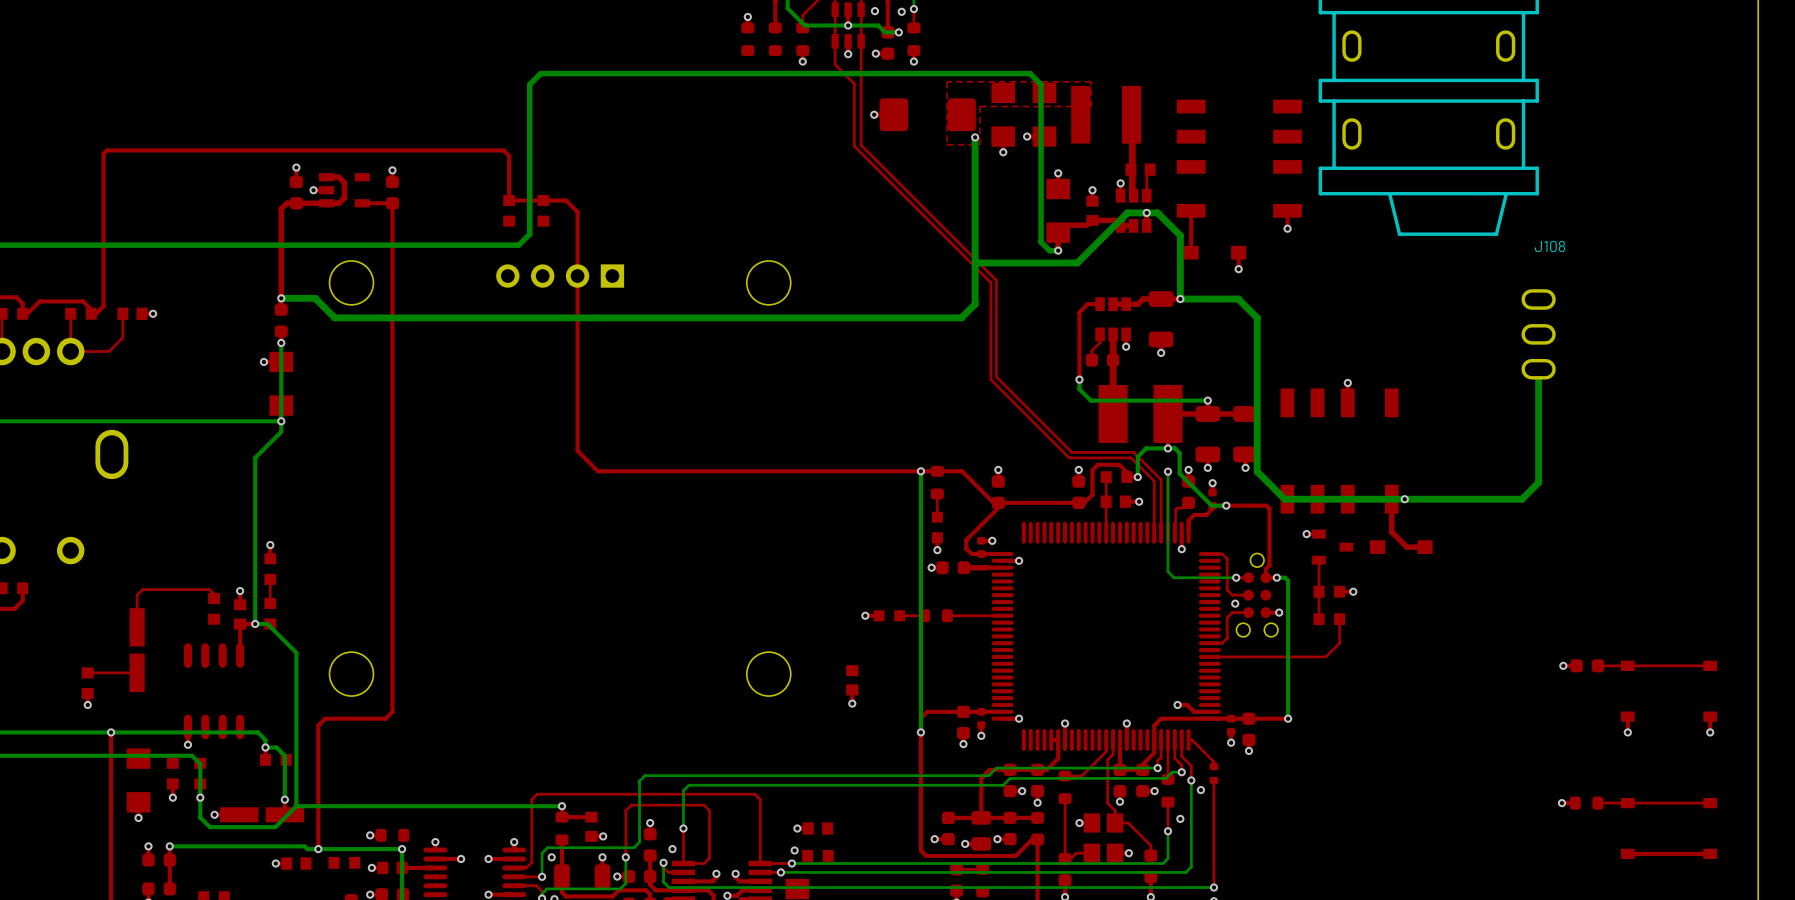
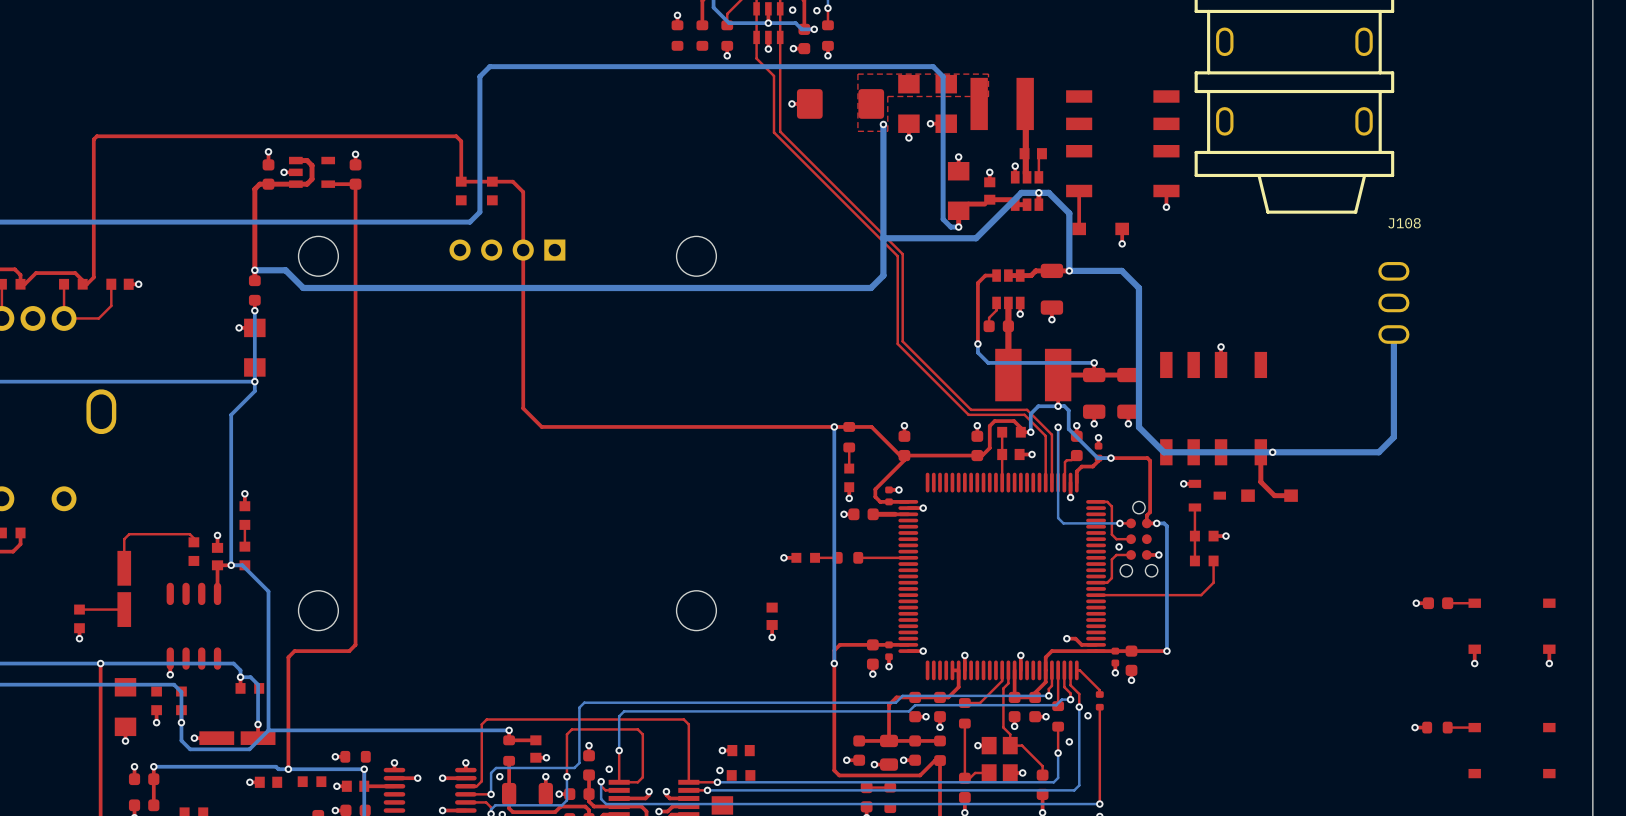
top track: (1710, 665) (1627, 665) -> none
top track: (1710, 803) (1627, 803) -> none
top track: (1710, 853) (1627, 853) -> none

